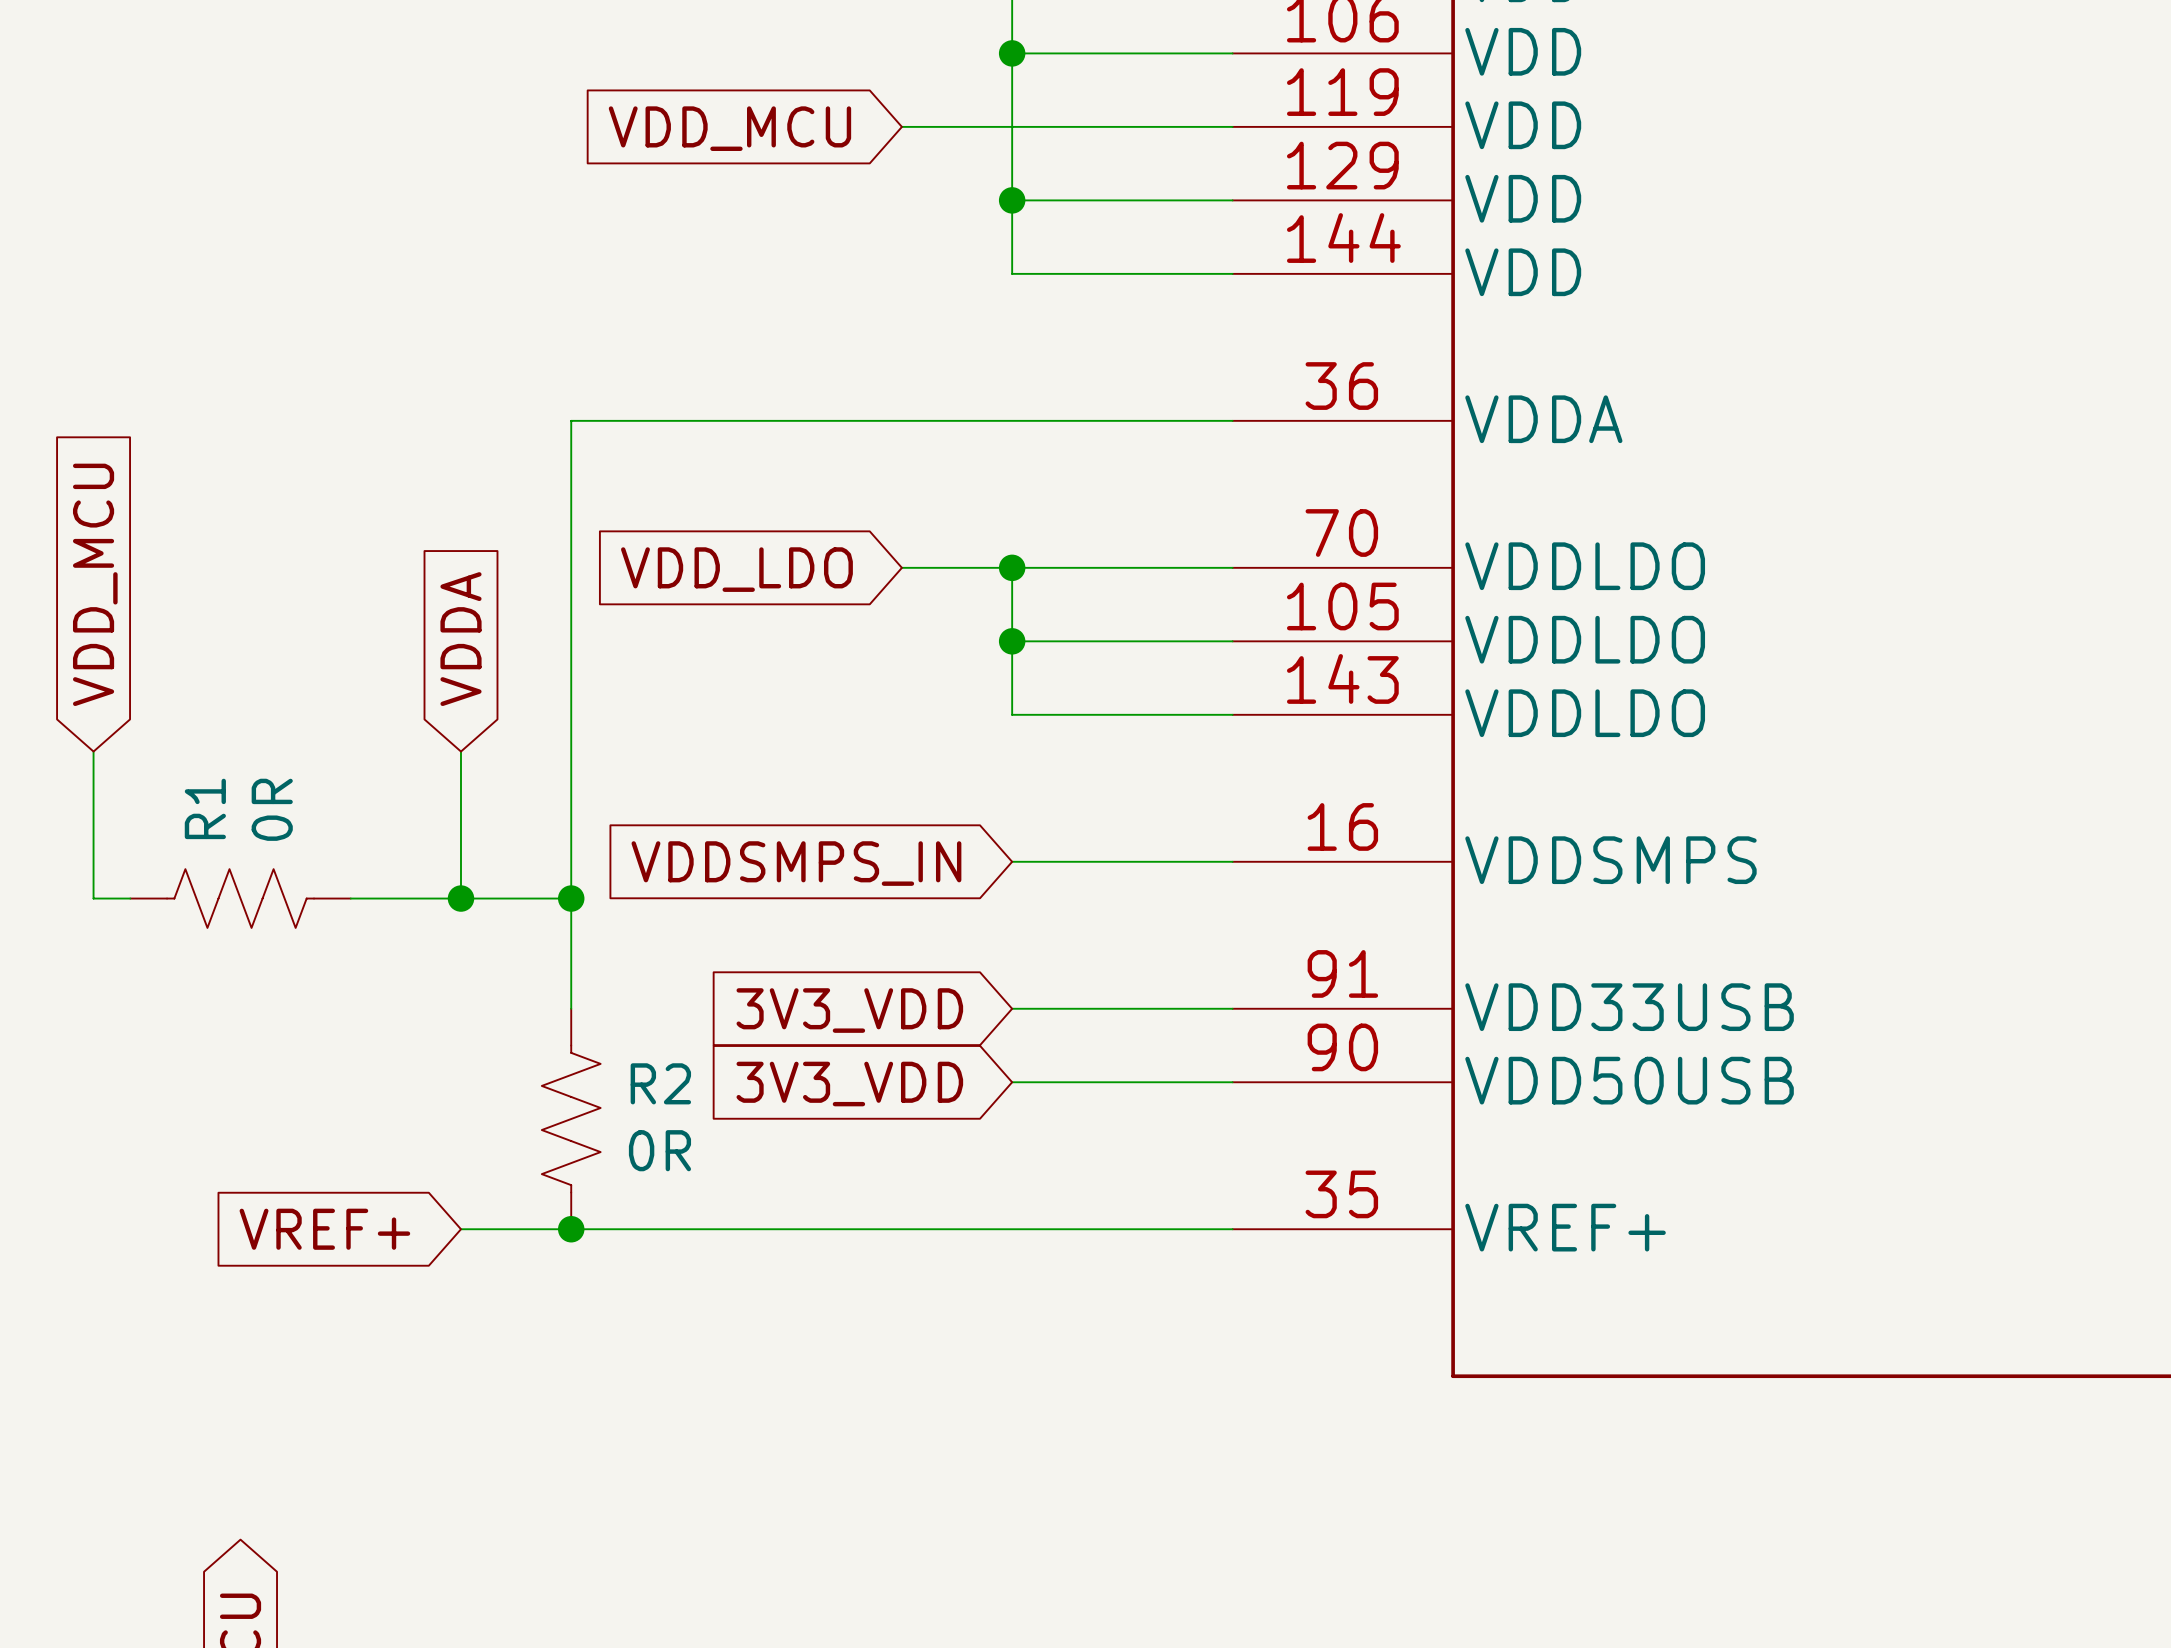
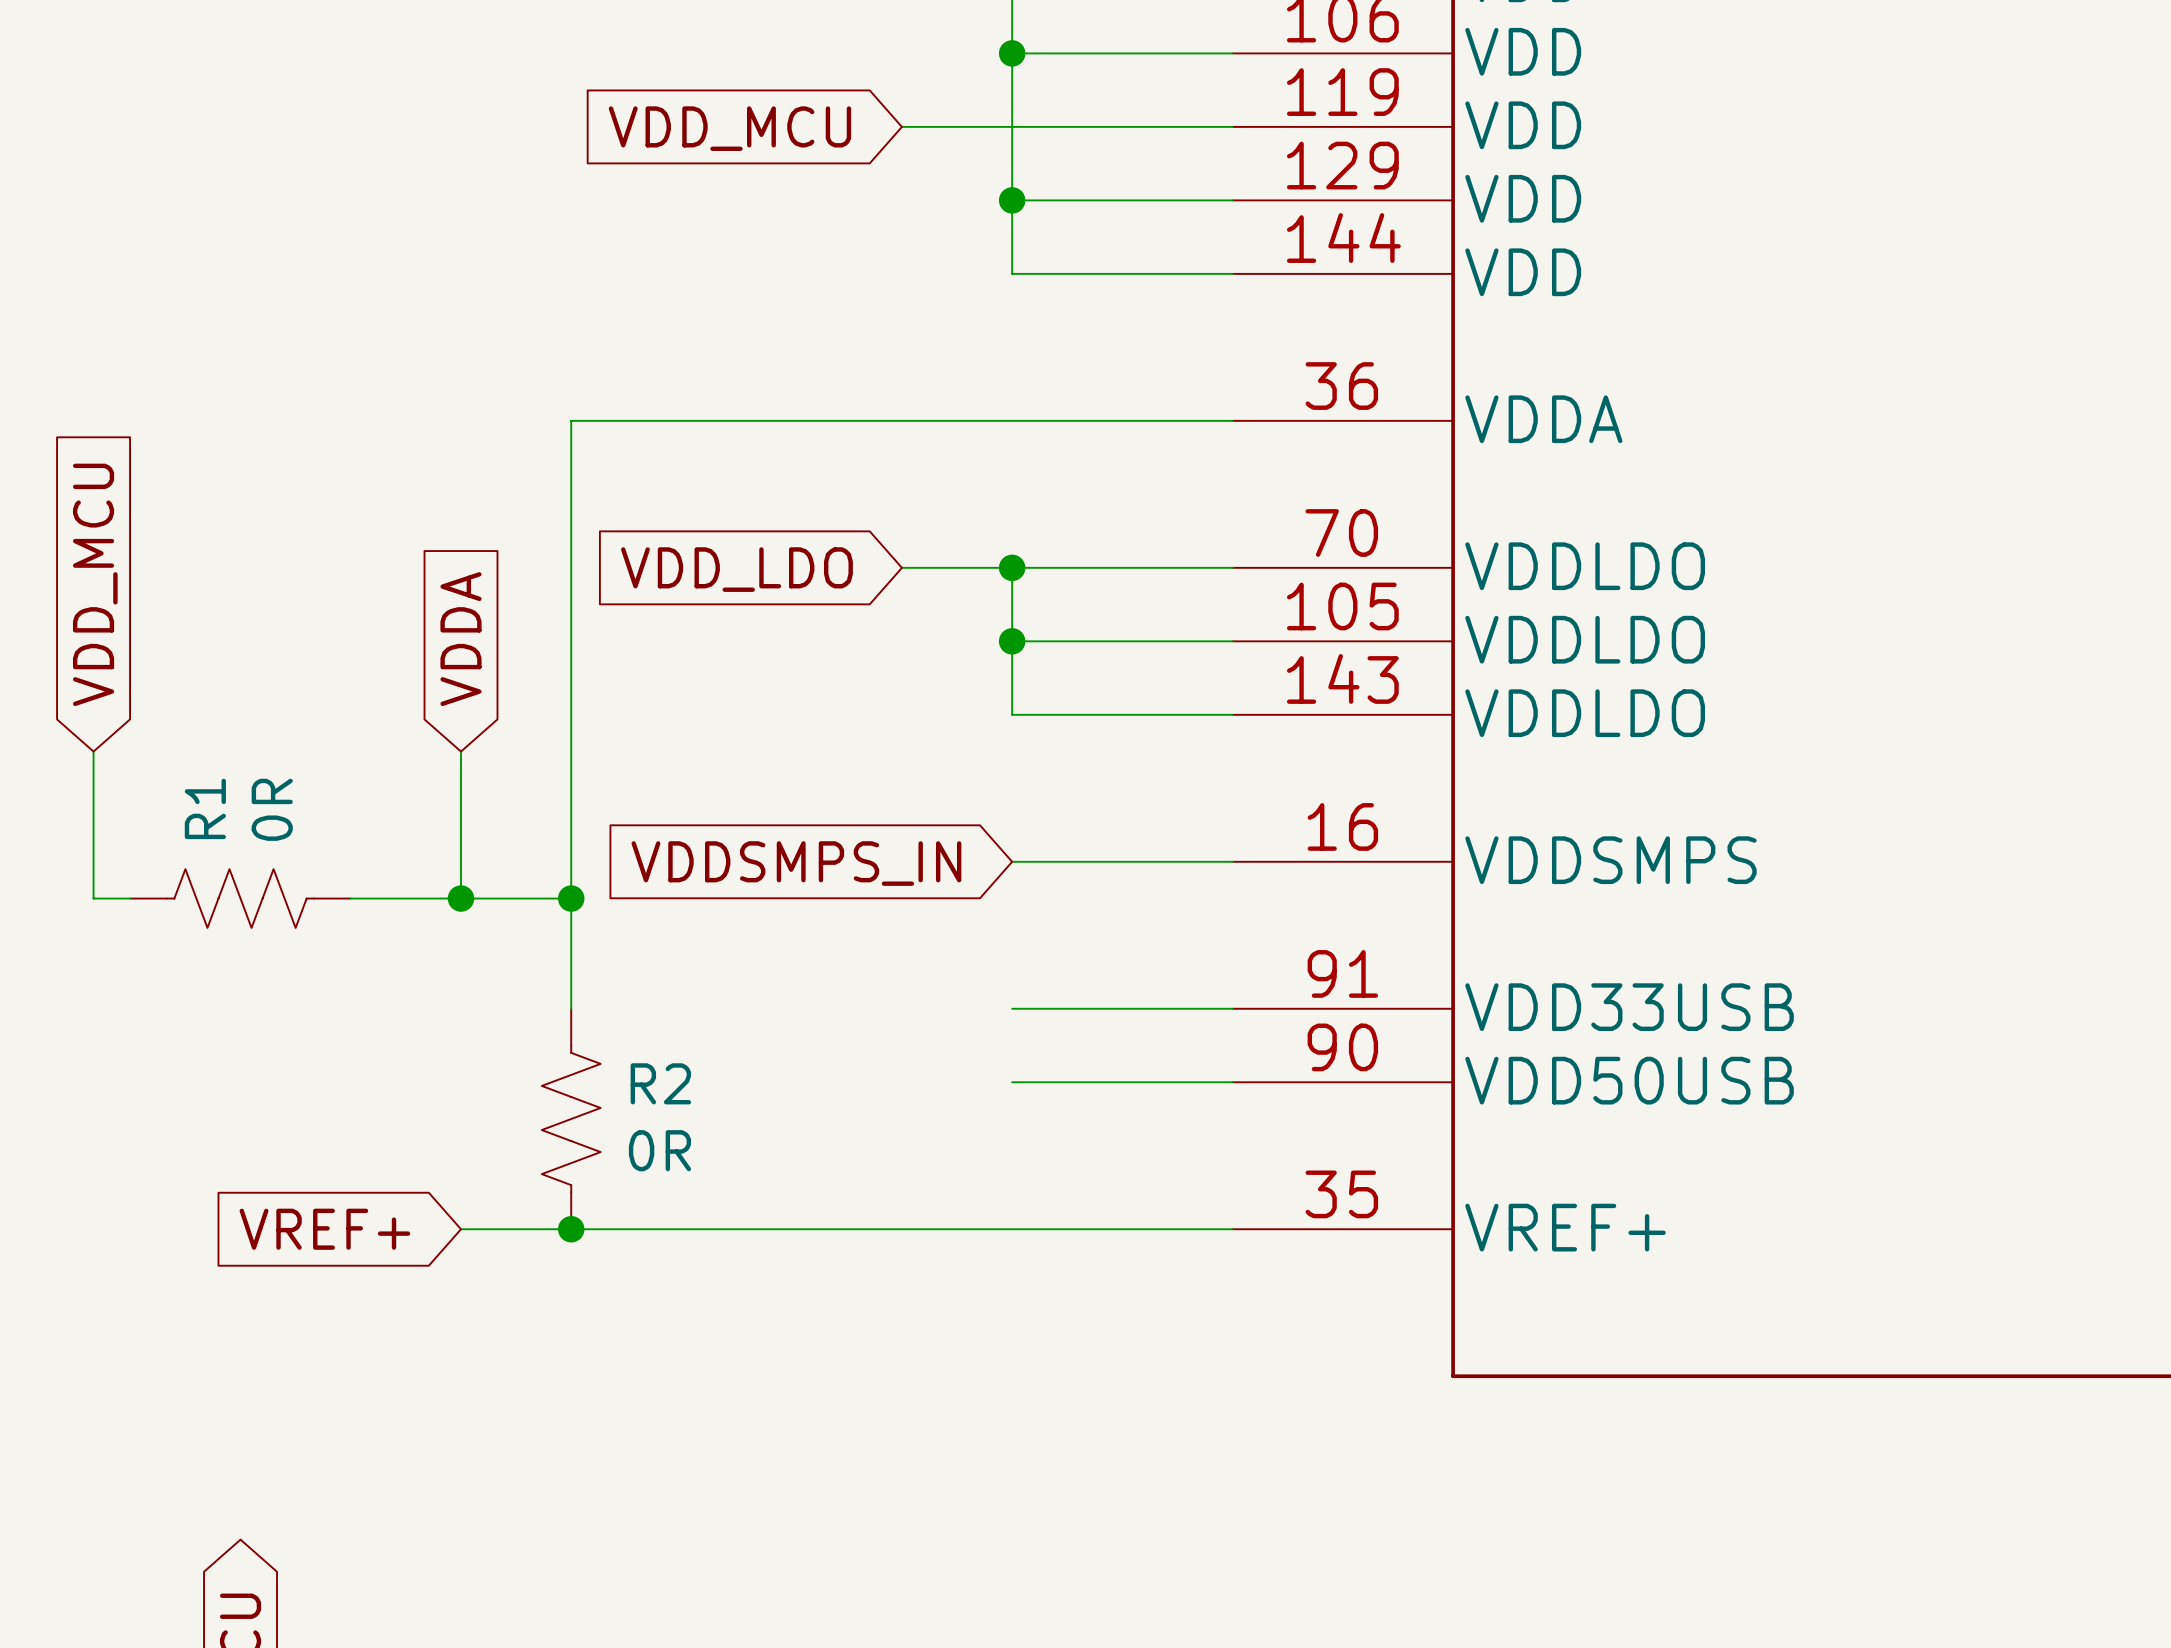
global label: 3V3_VDD (849, 1010) -> none
global label: 3V3_VDD (849, 1084) -> none

